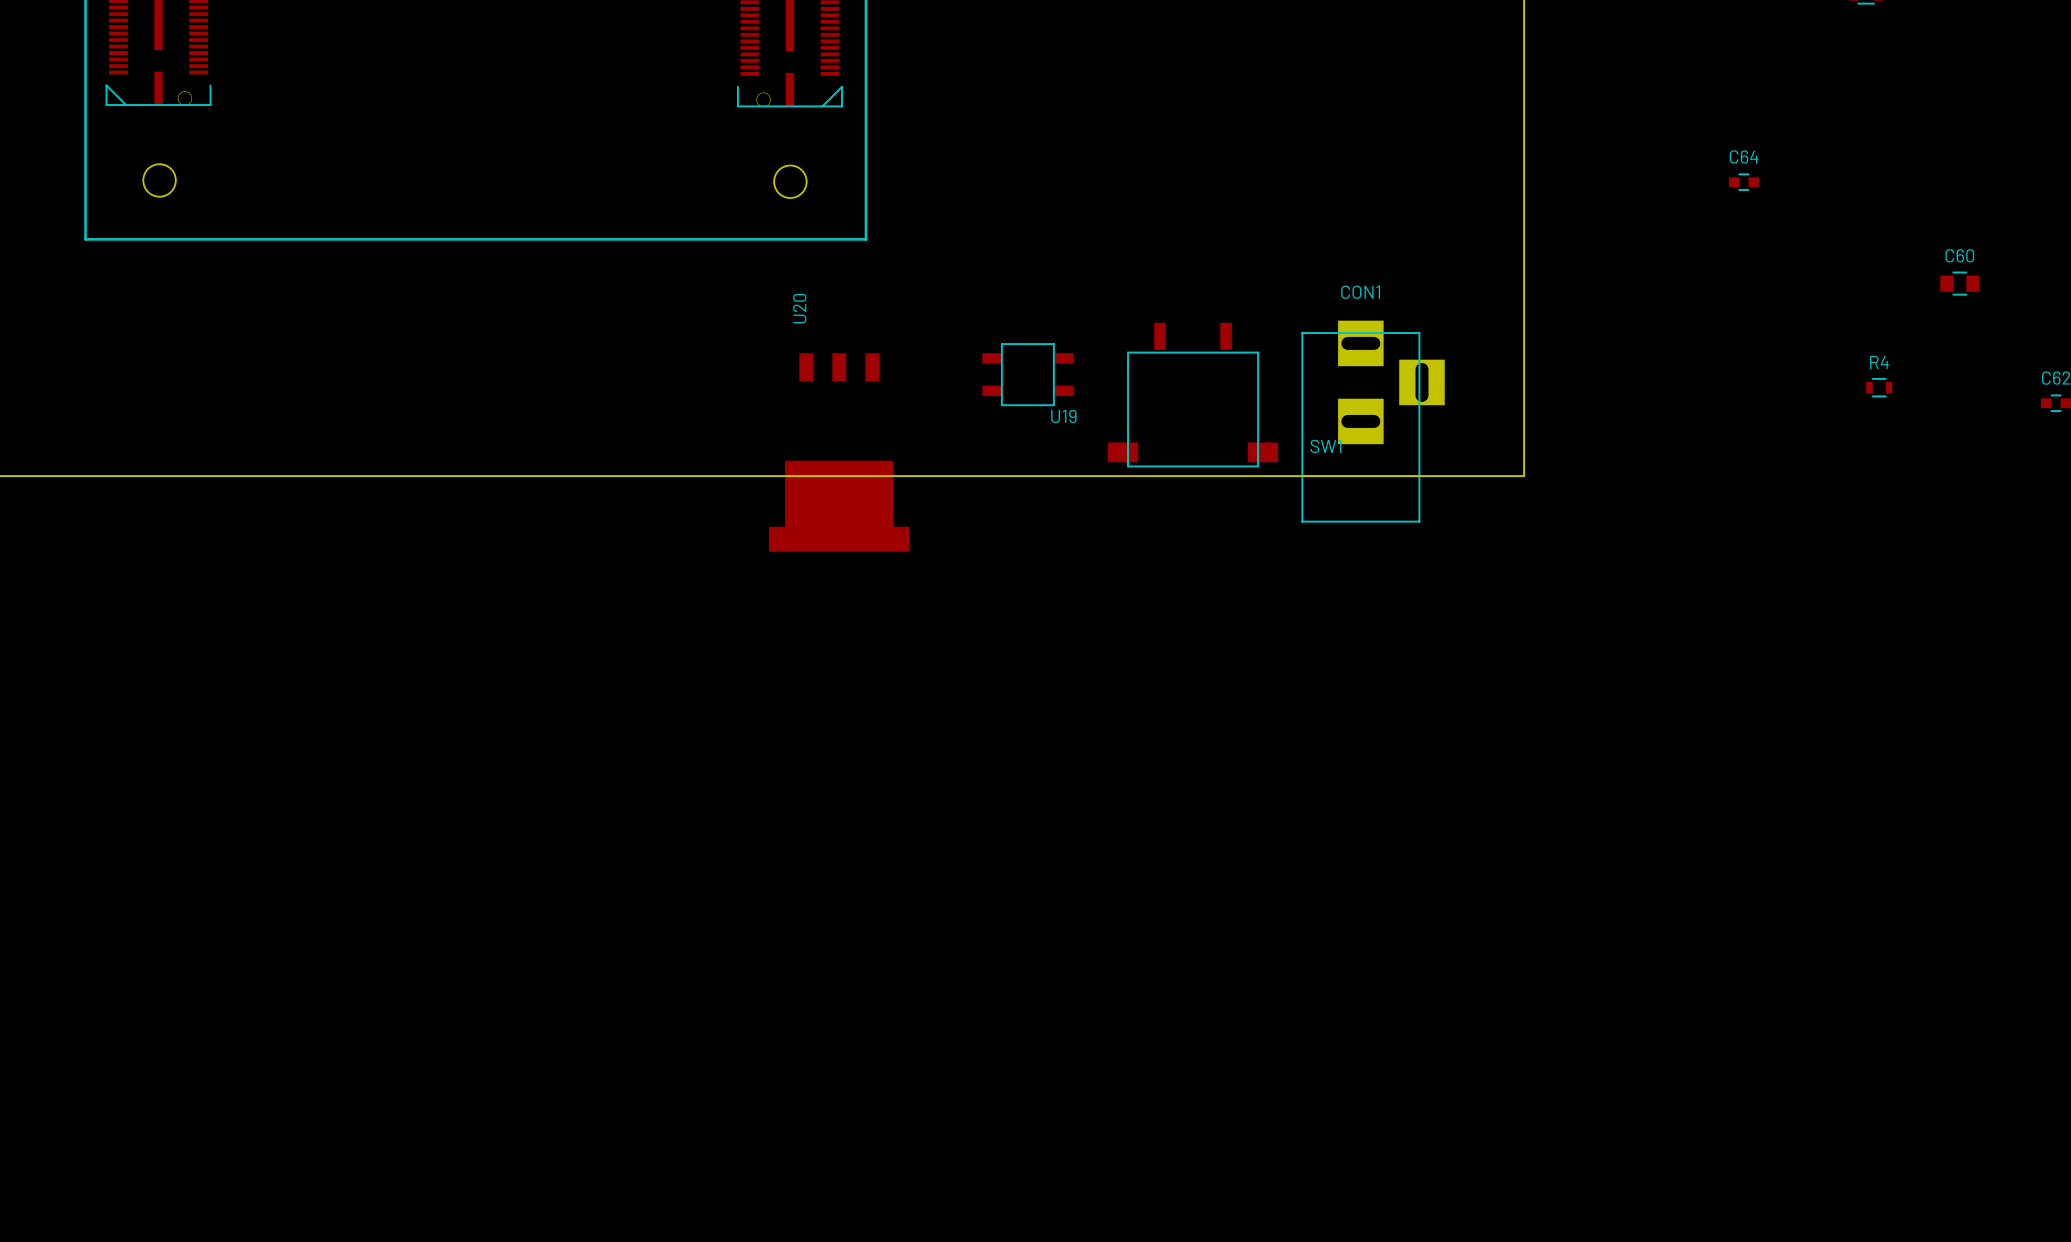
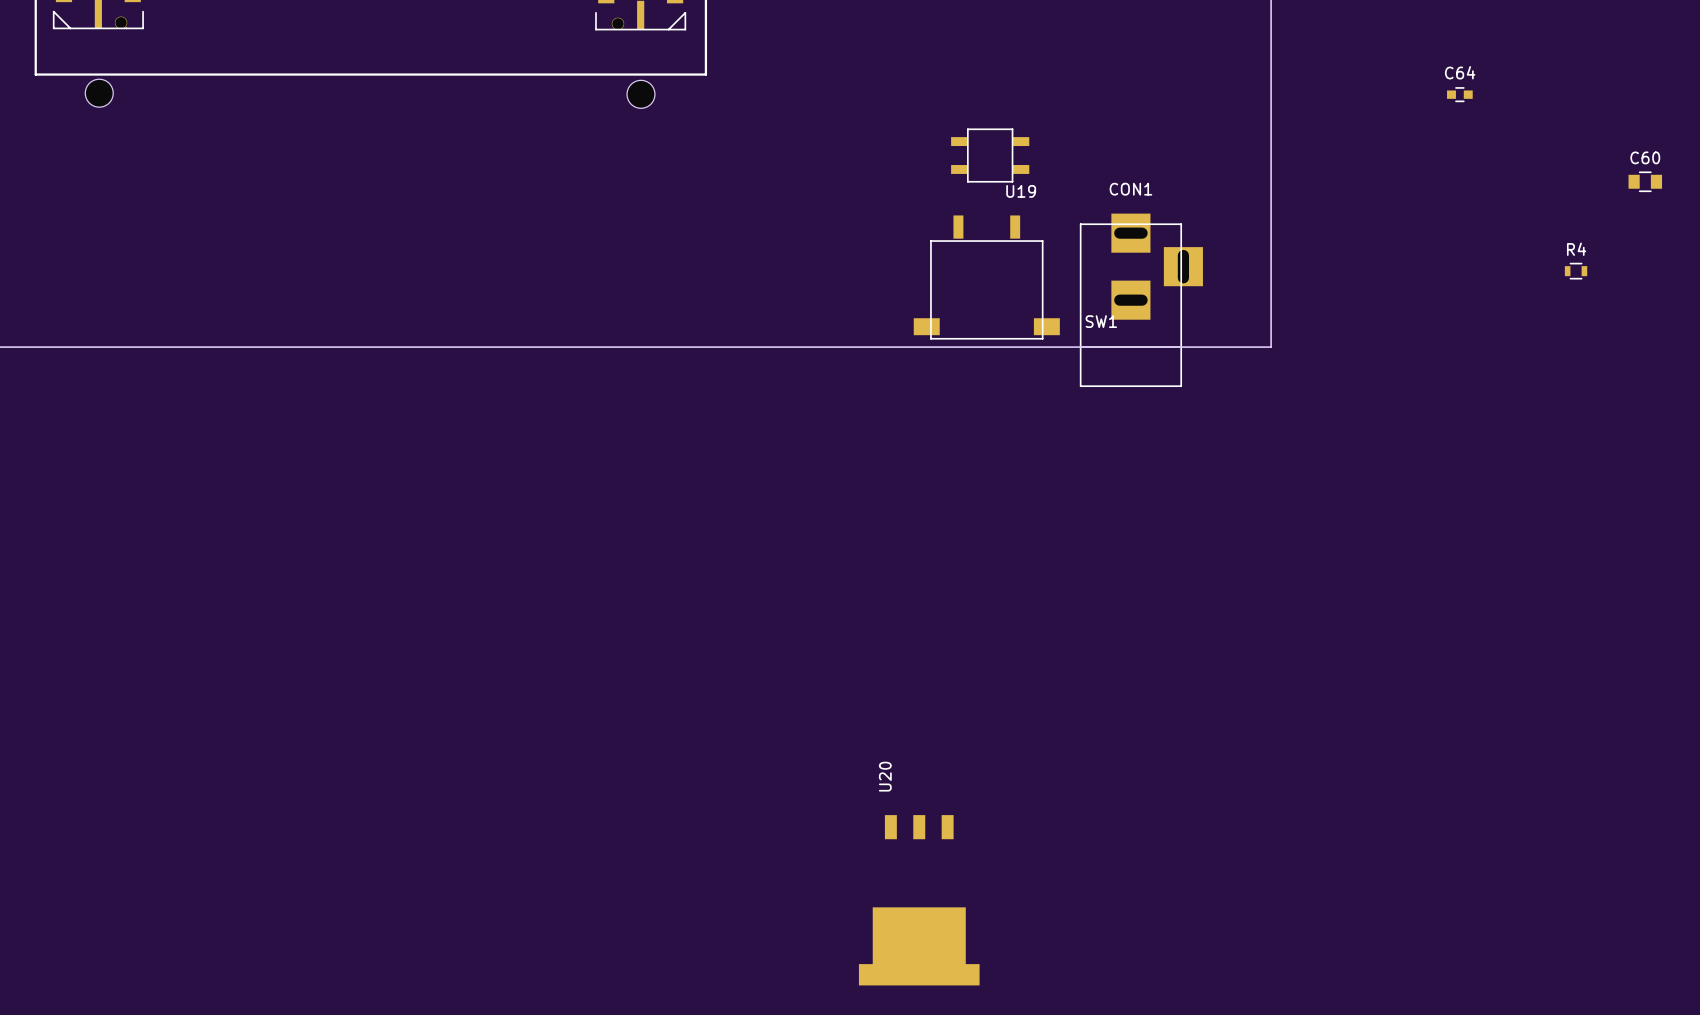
line: (85, 158) (85, 239) (865, 239) (865, 158) -> (35, 74) (705, 74)
U19 position: (1027, 374) -> (990, 155)
U20 position: (839, 452) -> (919, 900)

